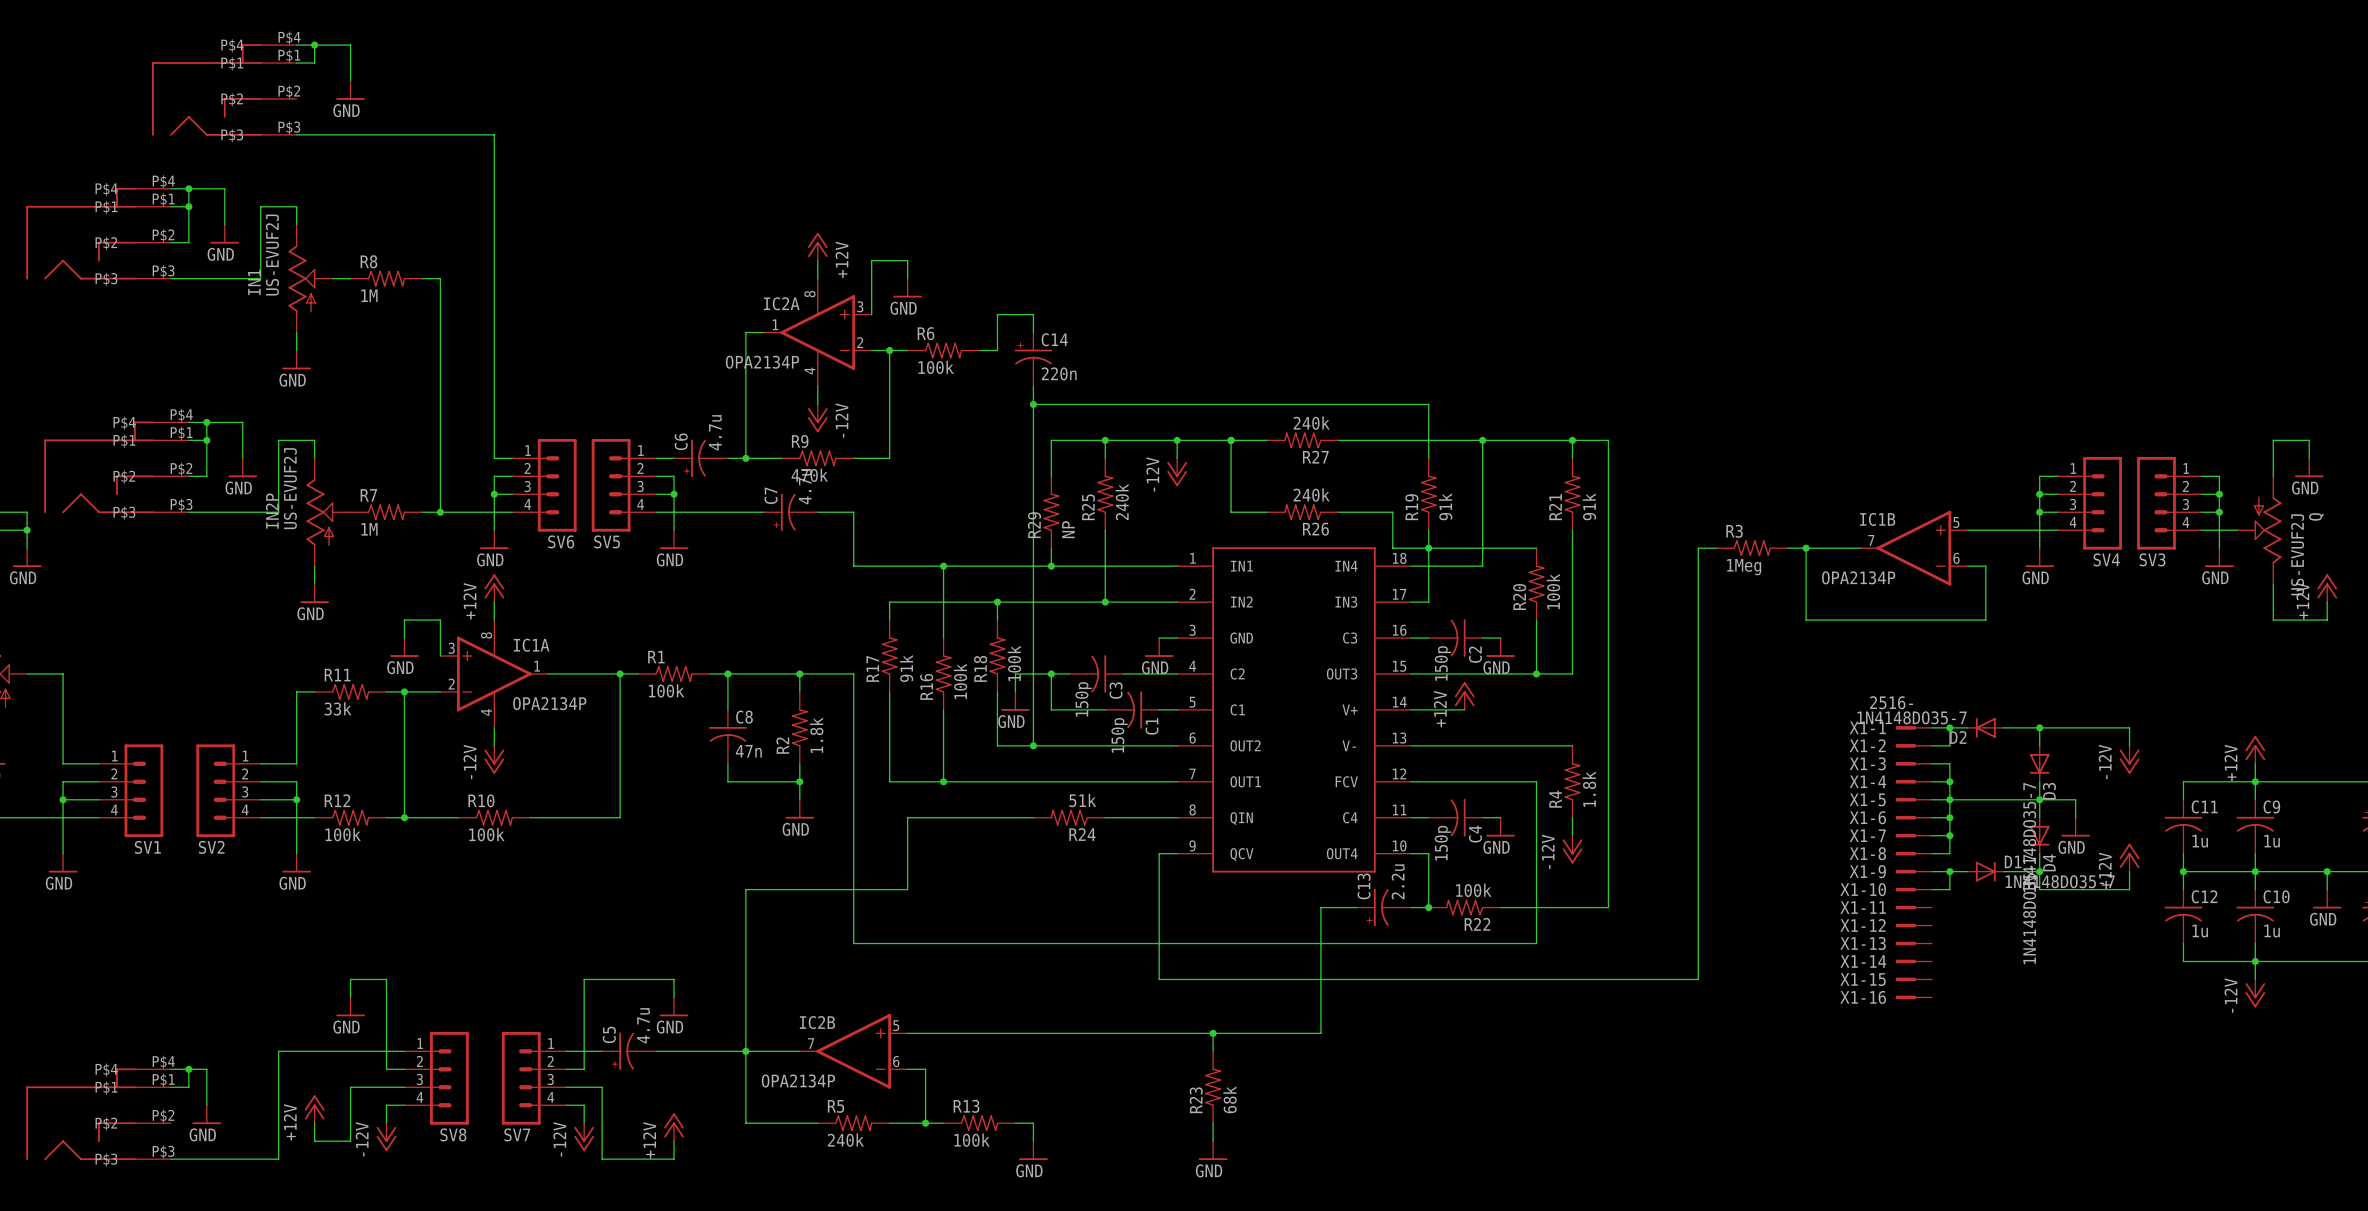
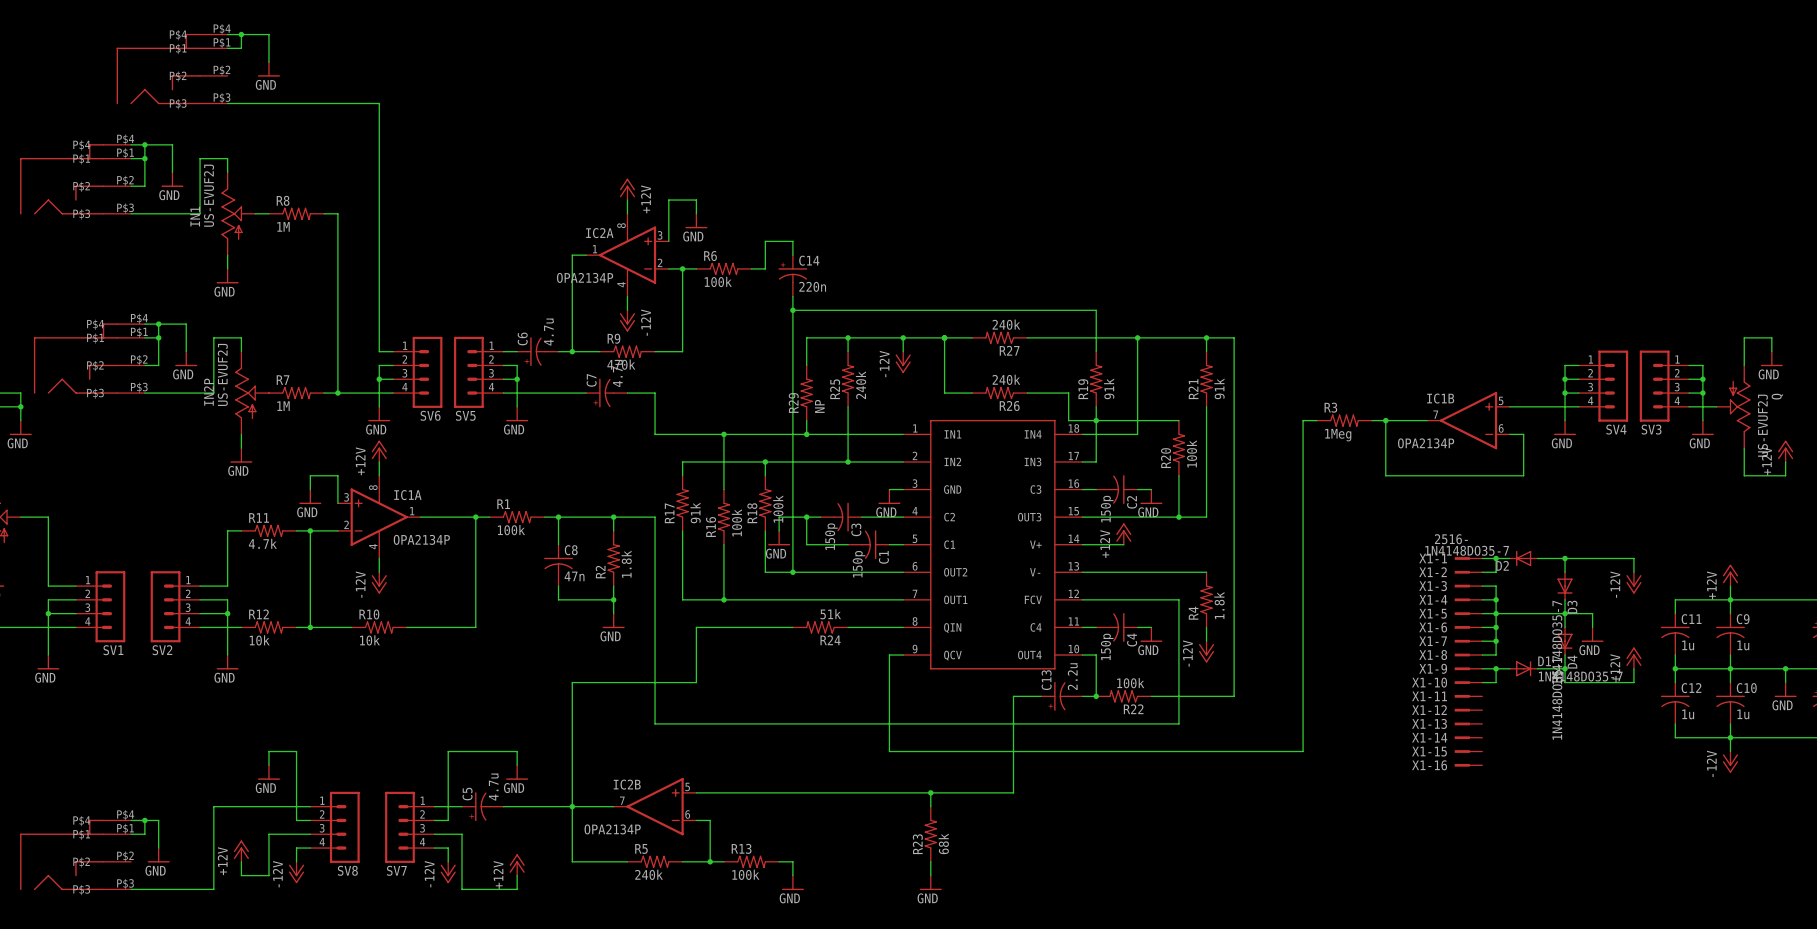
R11 value: 33k (338, 708) -> 4.7k (262, 543)
R12 value: 100k (343, 834) -> 10k (259, 640)
R10 value: 100k (486, 834) -> 10k (369, 640)

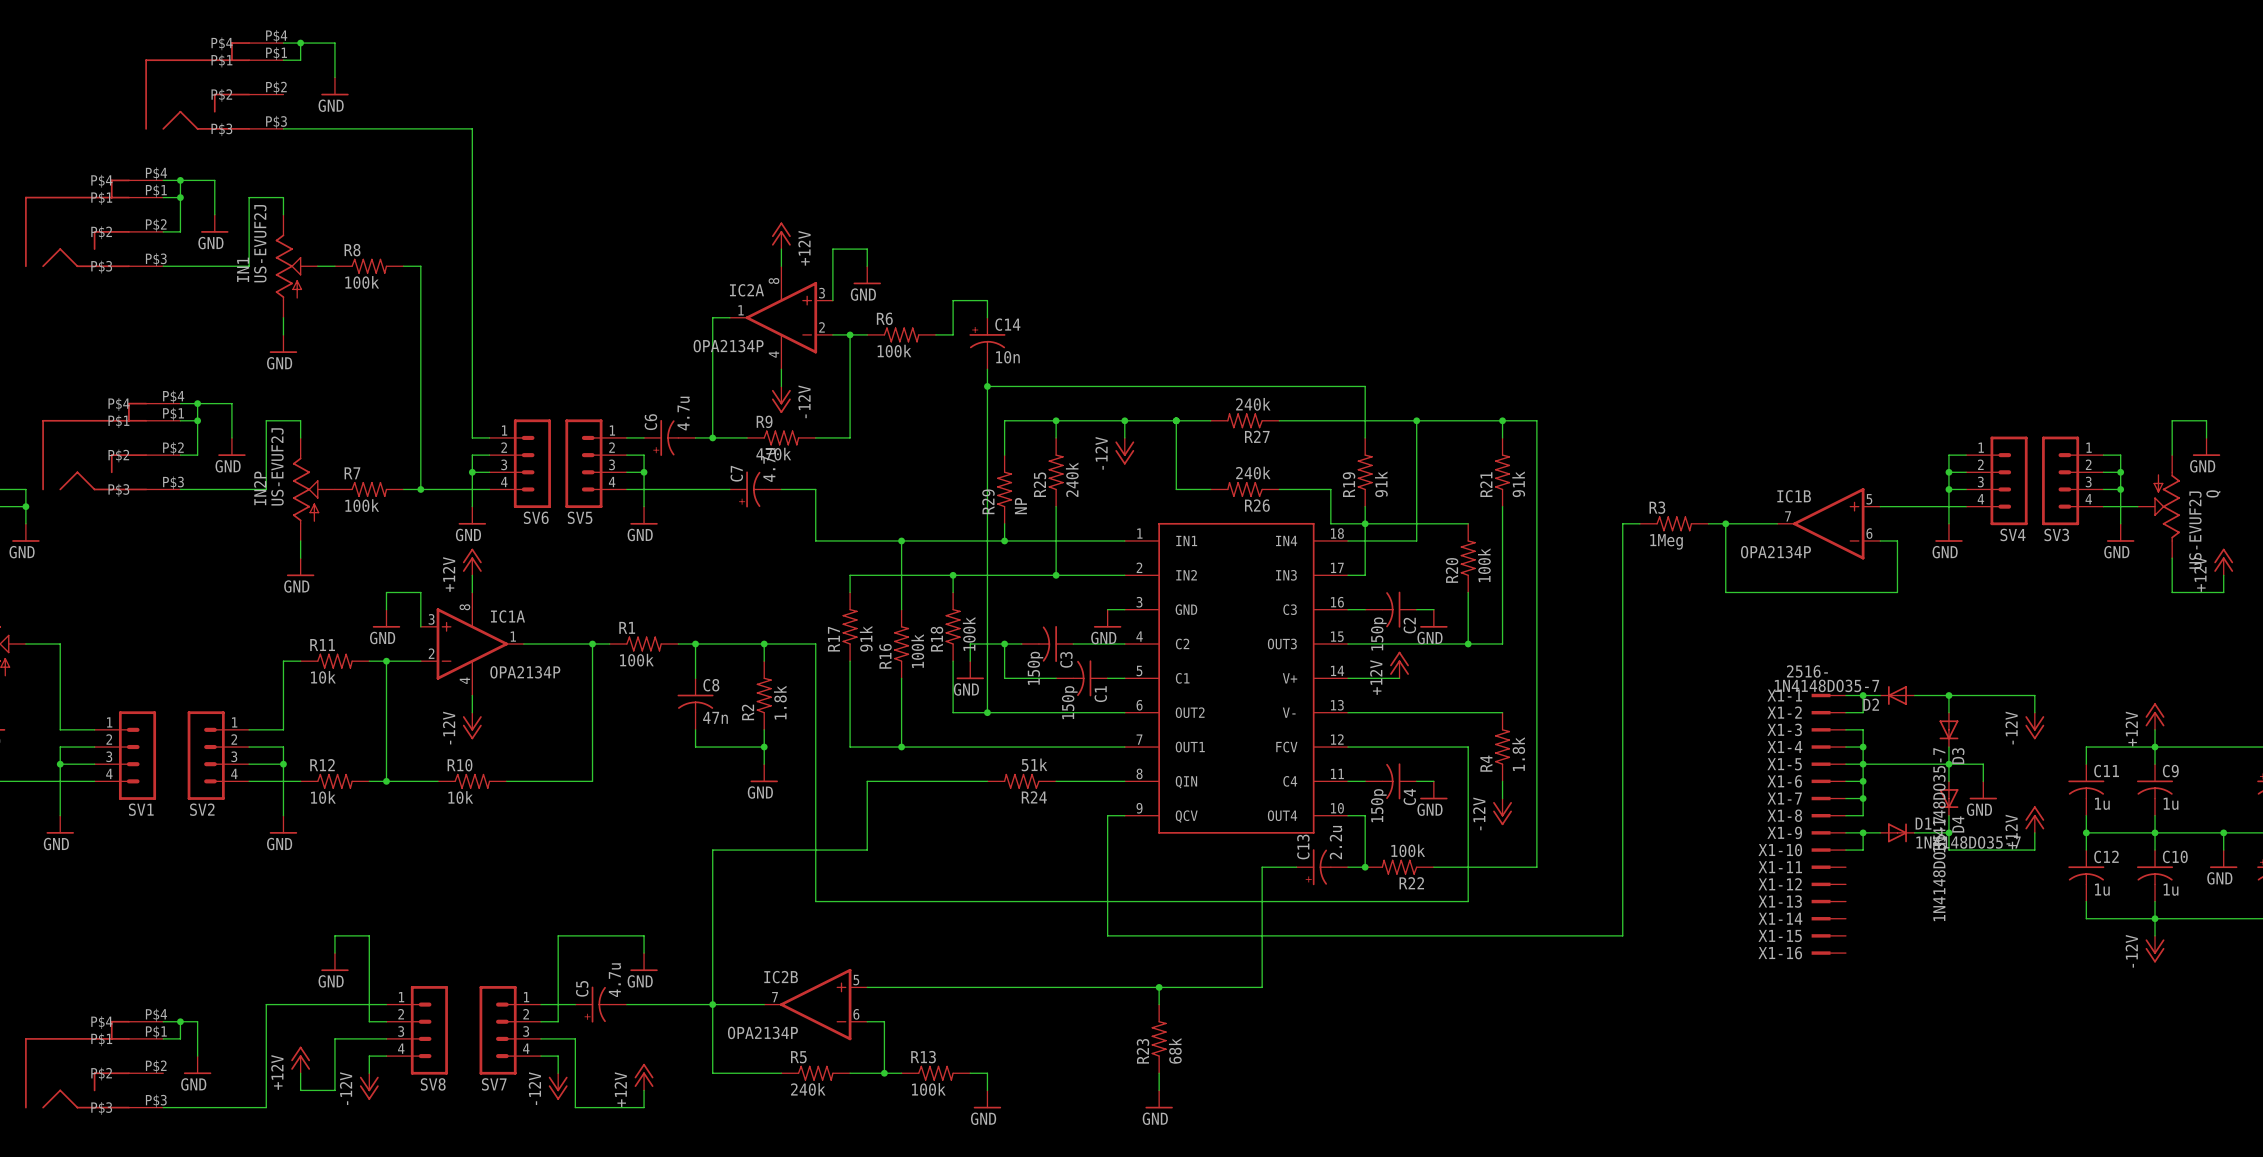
R8 value: 1M (283, 226) -> 100k (362, 282)
C14 value: 220n (812, 286) -> 10n (1007, 357)
R7 value: 1M (283, 406) -> 100k (362, 505)
R11 value: 4.7k (262, 543) -> 10k (323, 677)

